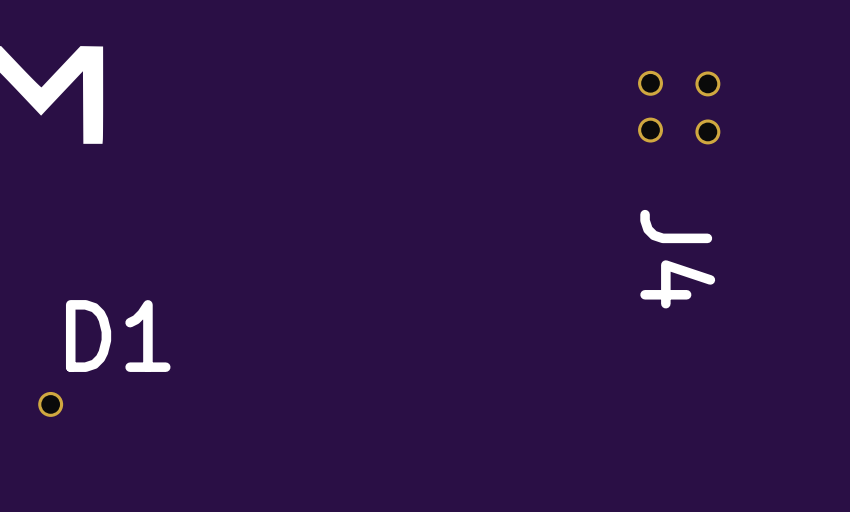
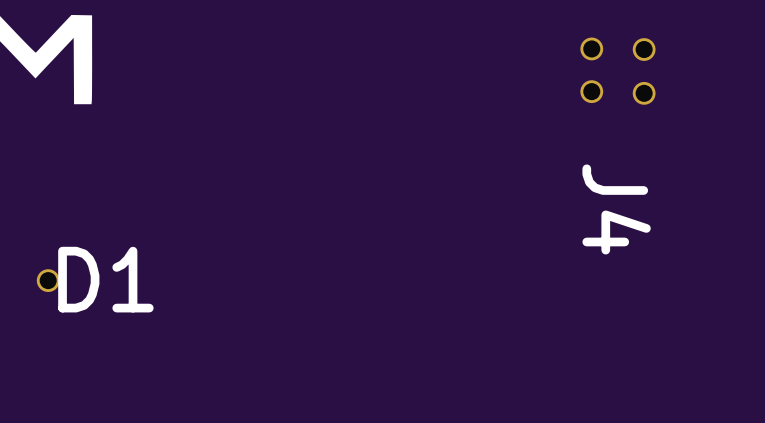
via position: (50, 404) -> (48, 280)

